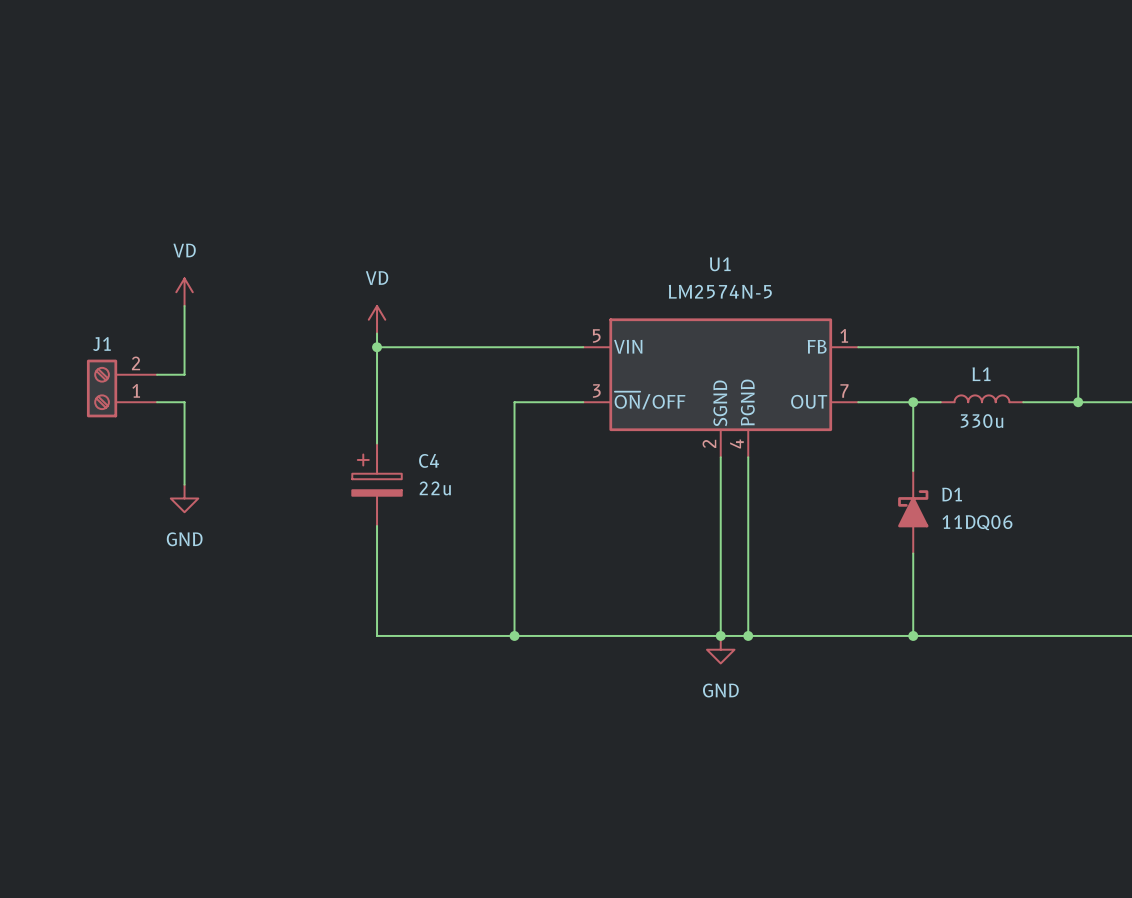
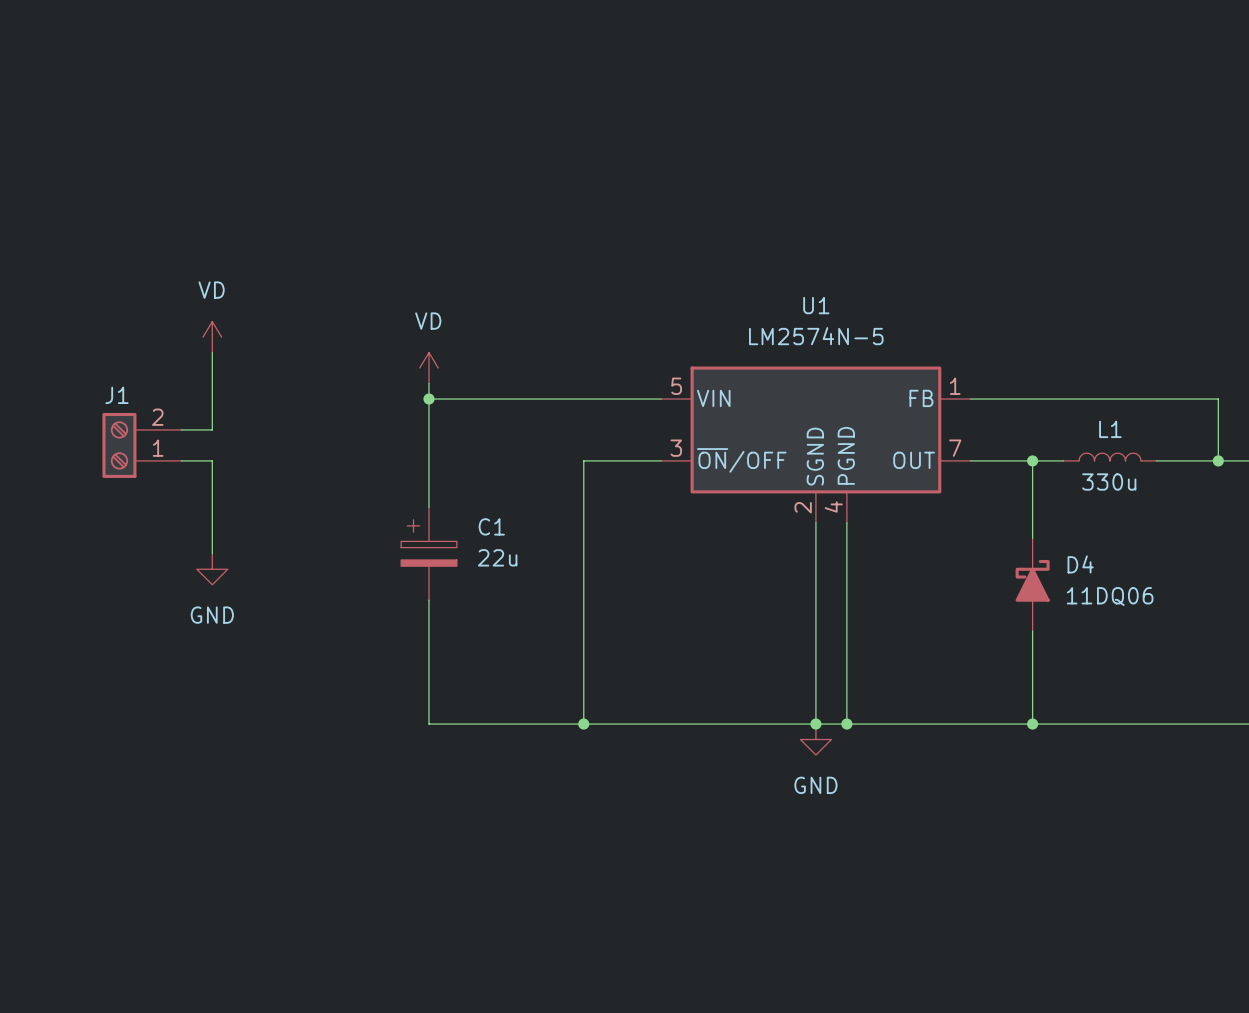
C4 name: C4 (429, 460) -> C1 (491, 526)
D1 name: D1 (952, 494) -> D4 (1080, 564)

